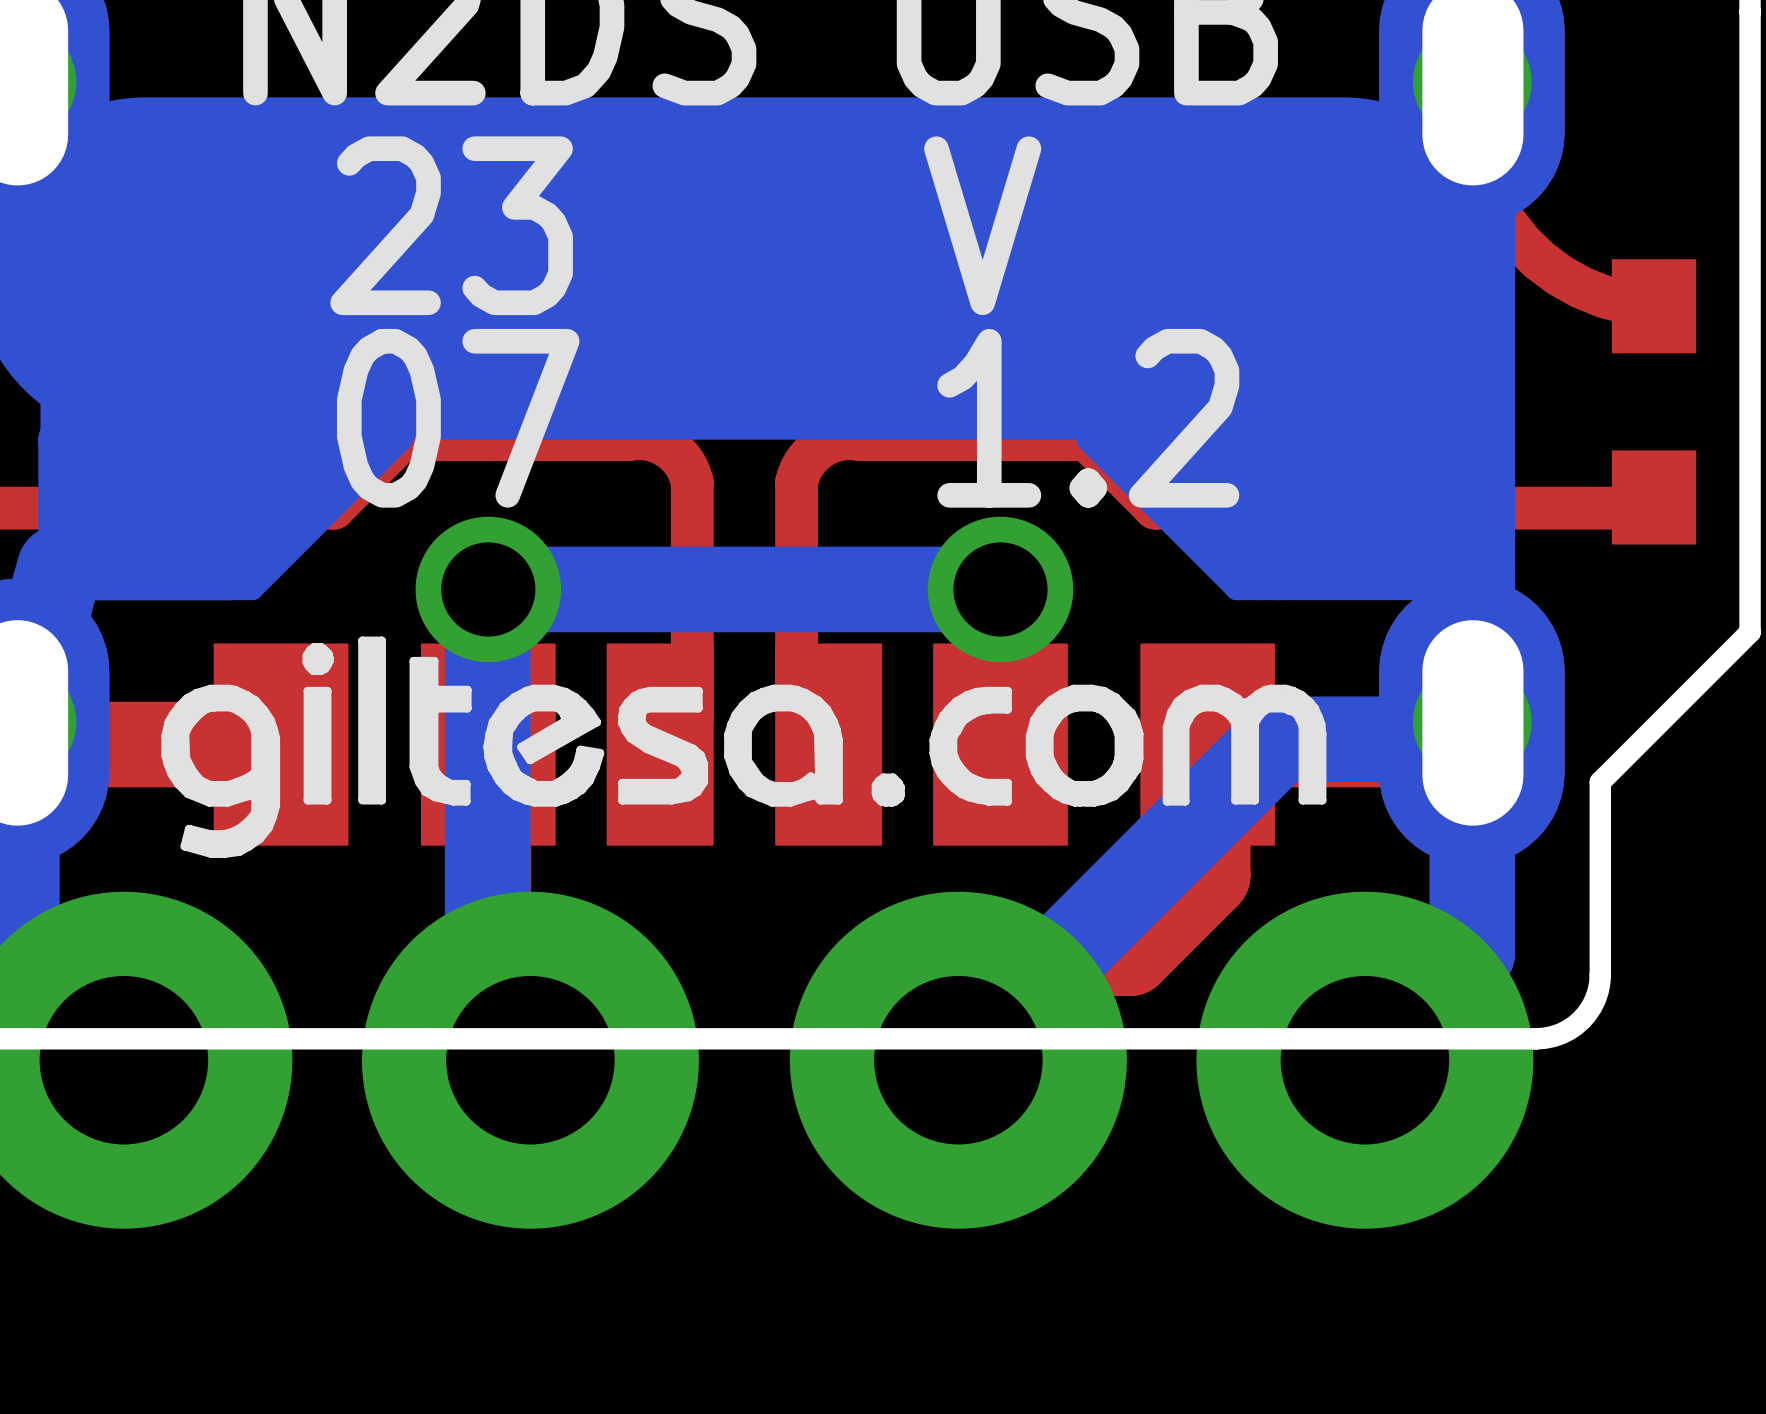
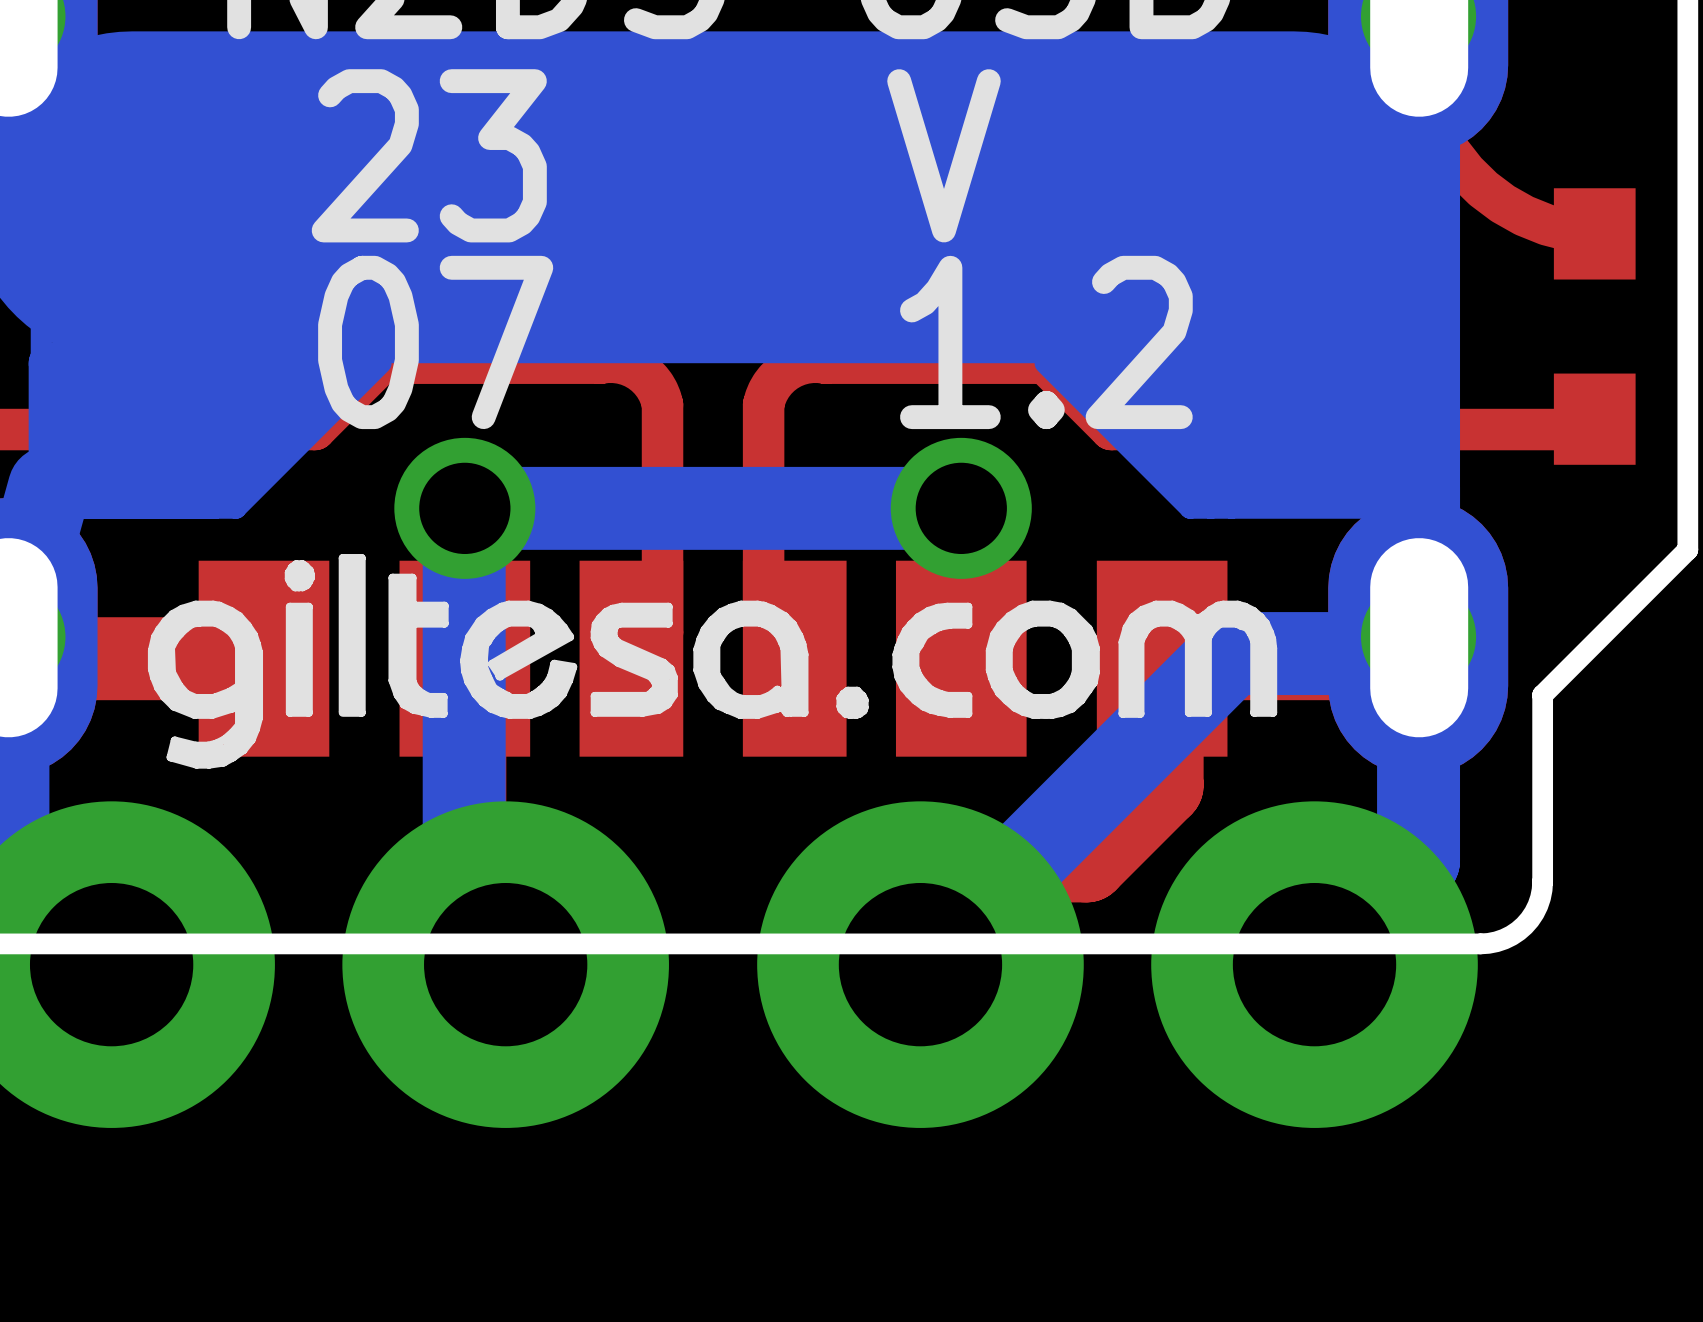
drawing shape: [161, 636, 1327, 859] -> [147, 554, 1278, 769]

